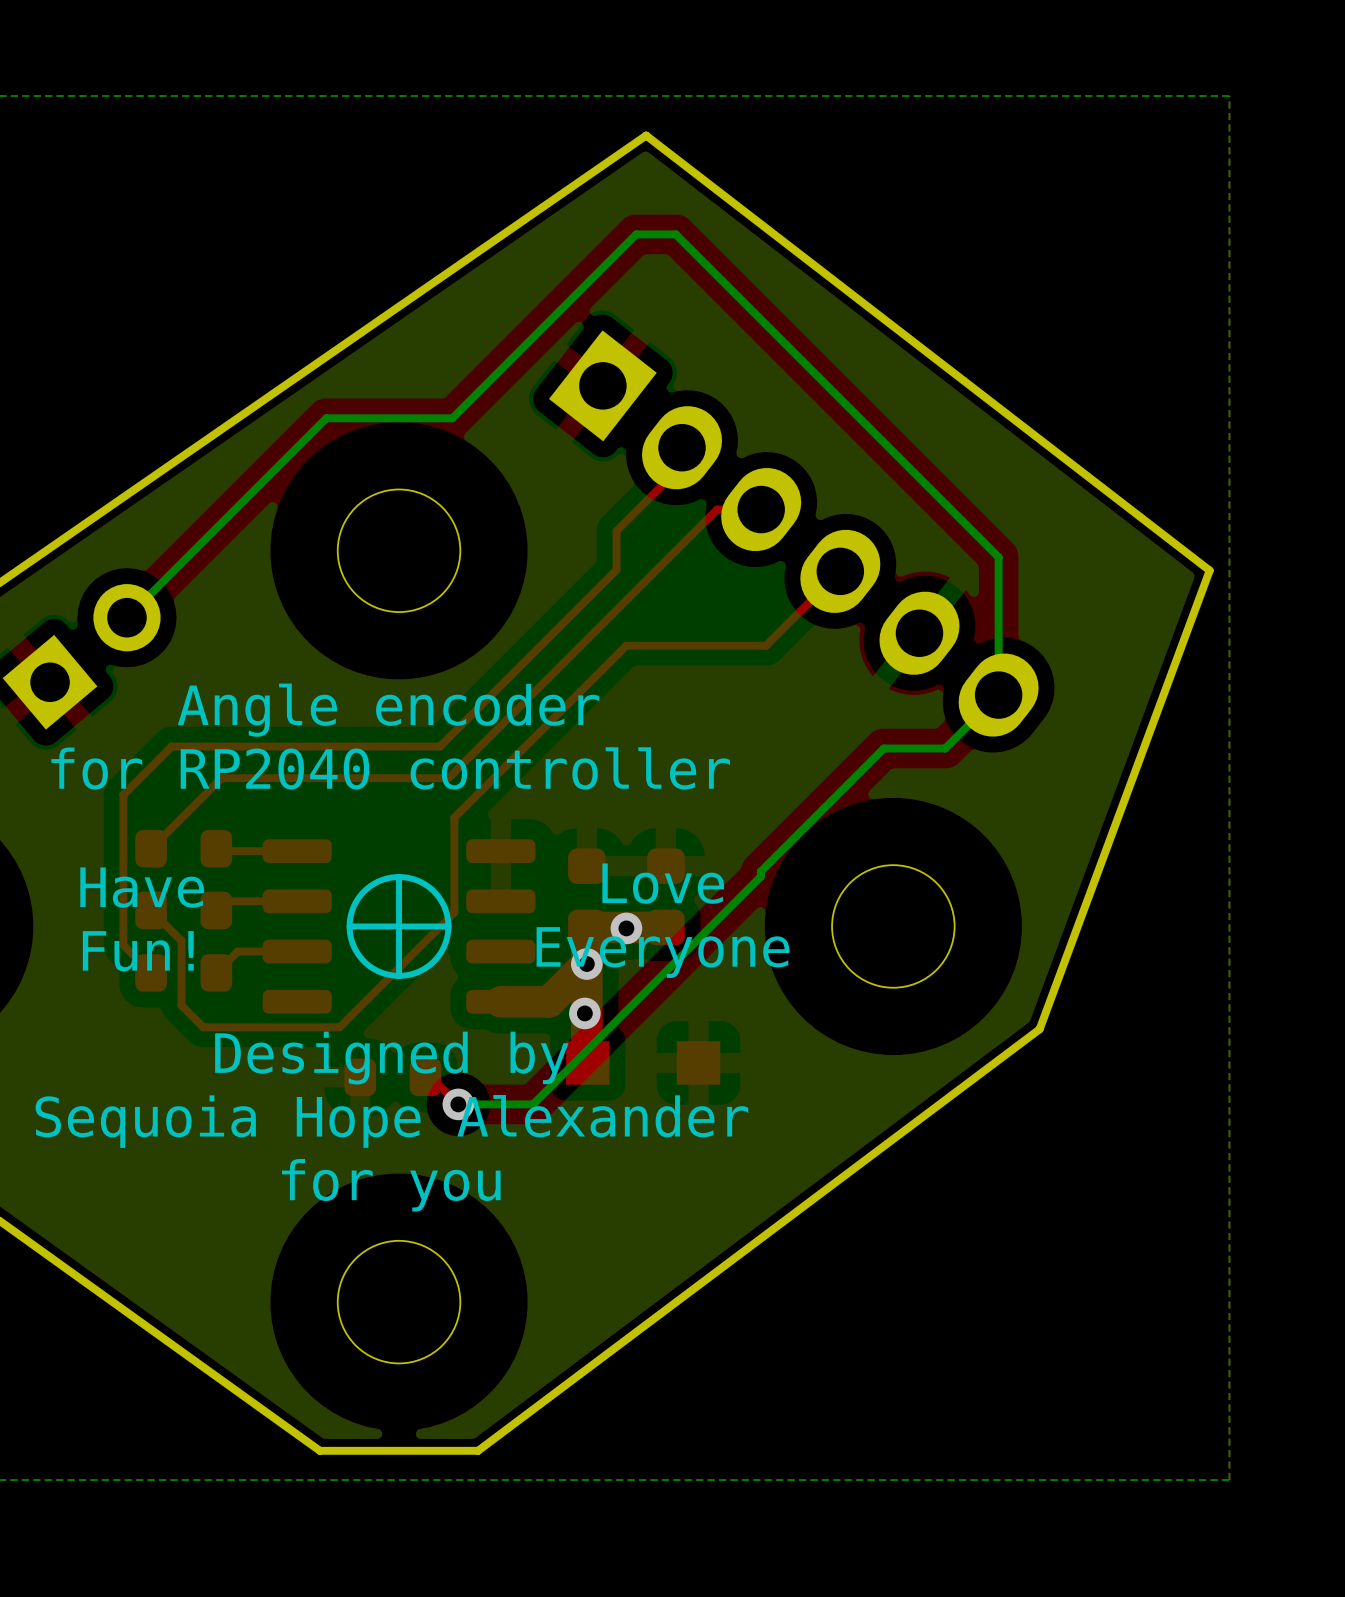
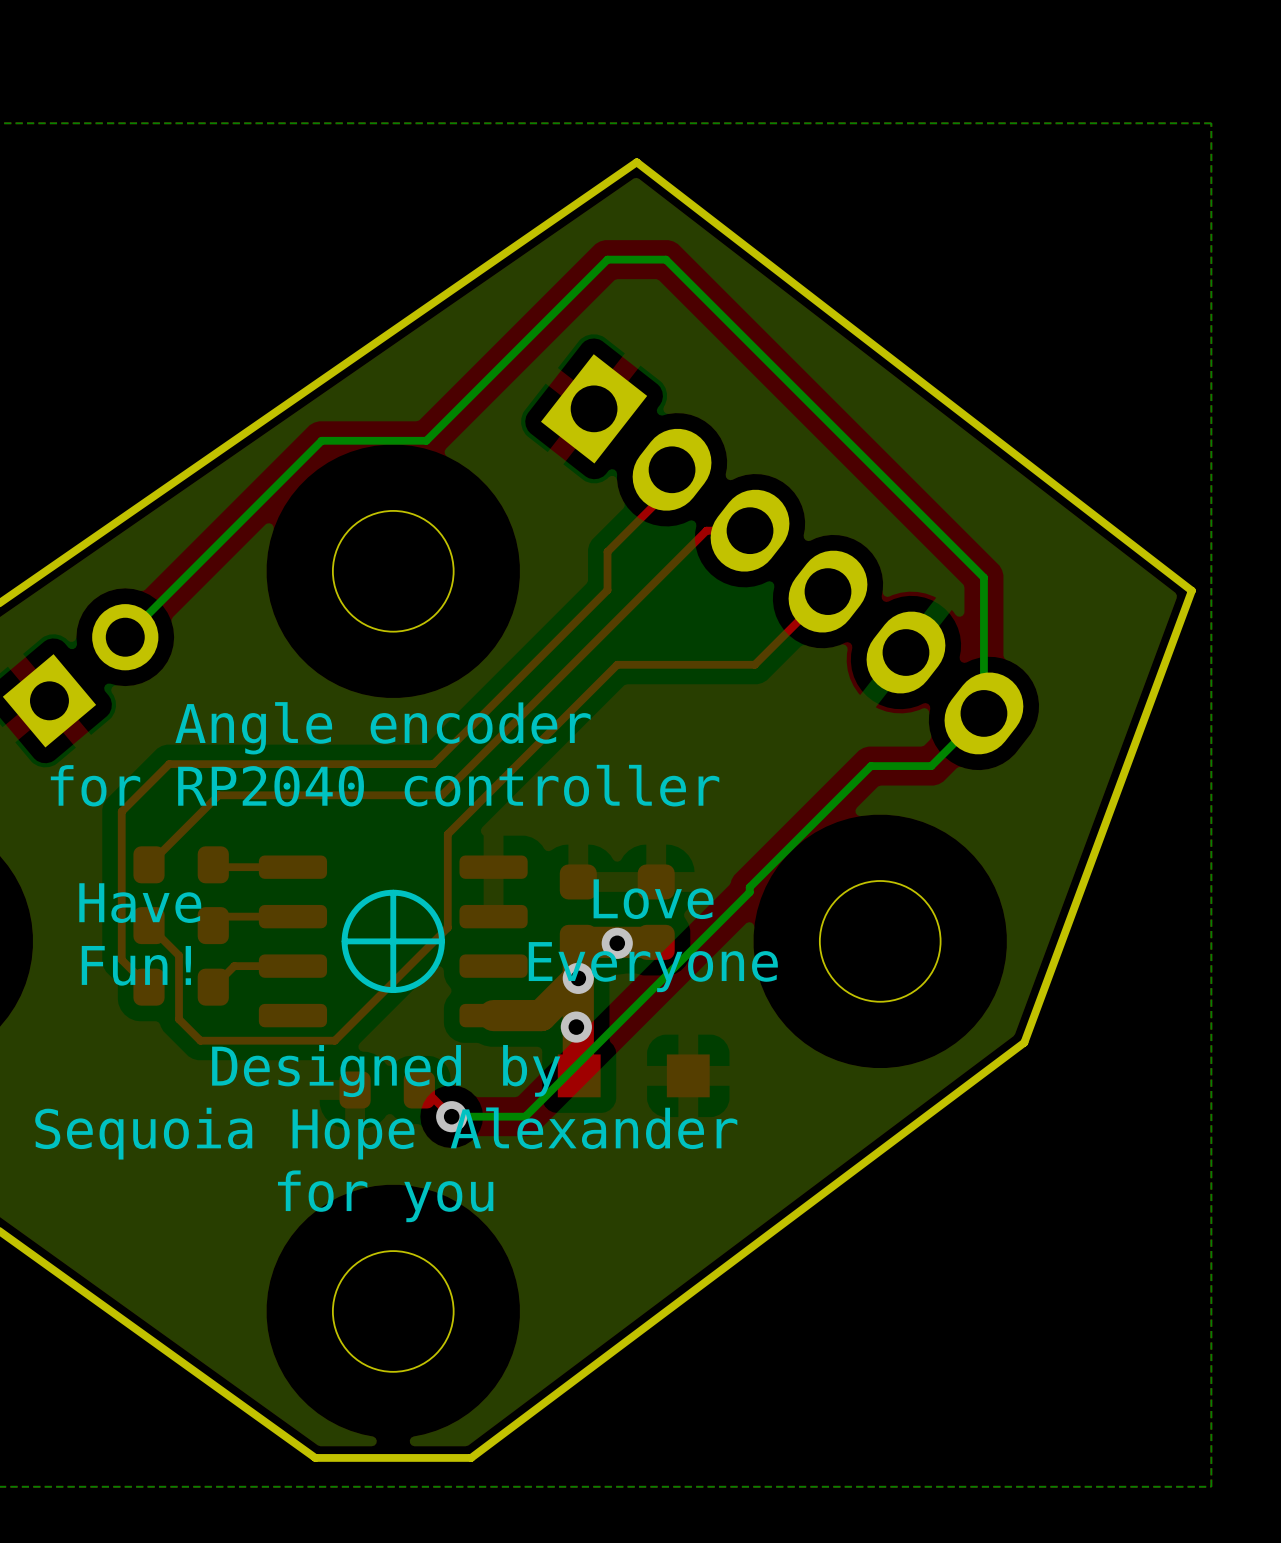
bottom track: (636, 234) (452, 418) (432, 418) -> (627, 259) (607, 259) (426, 440)

